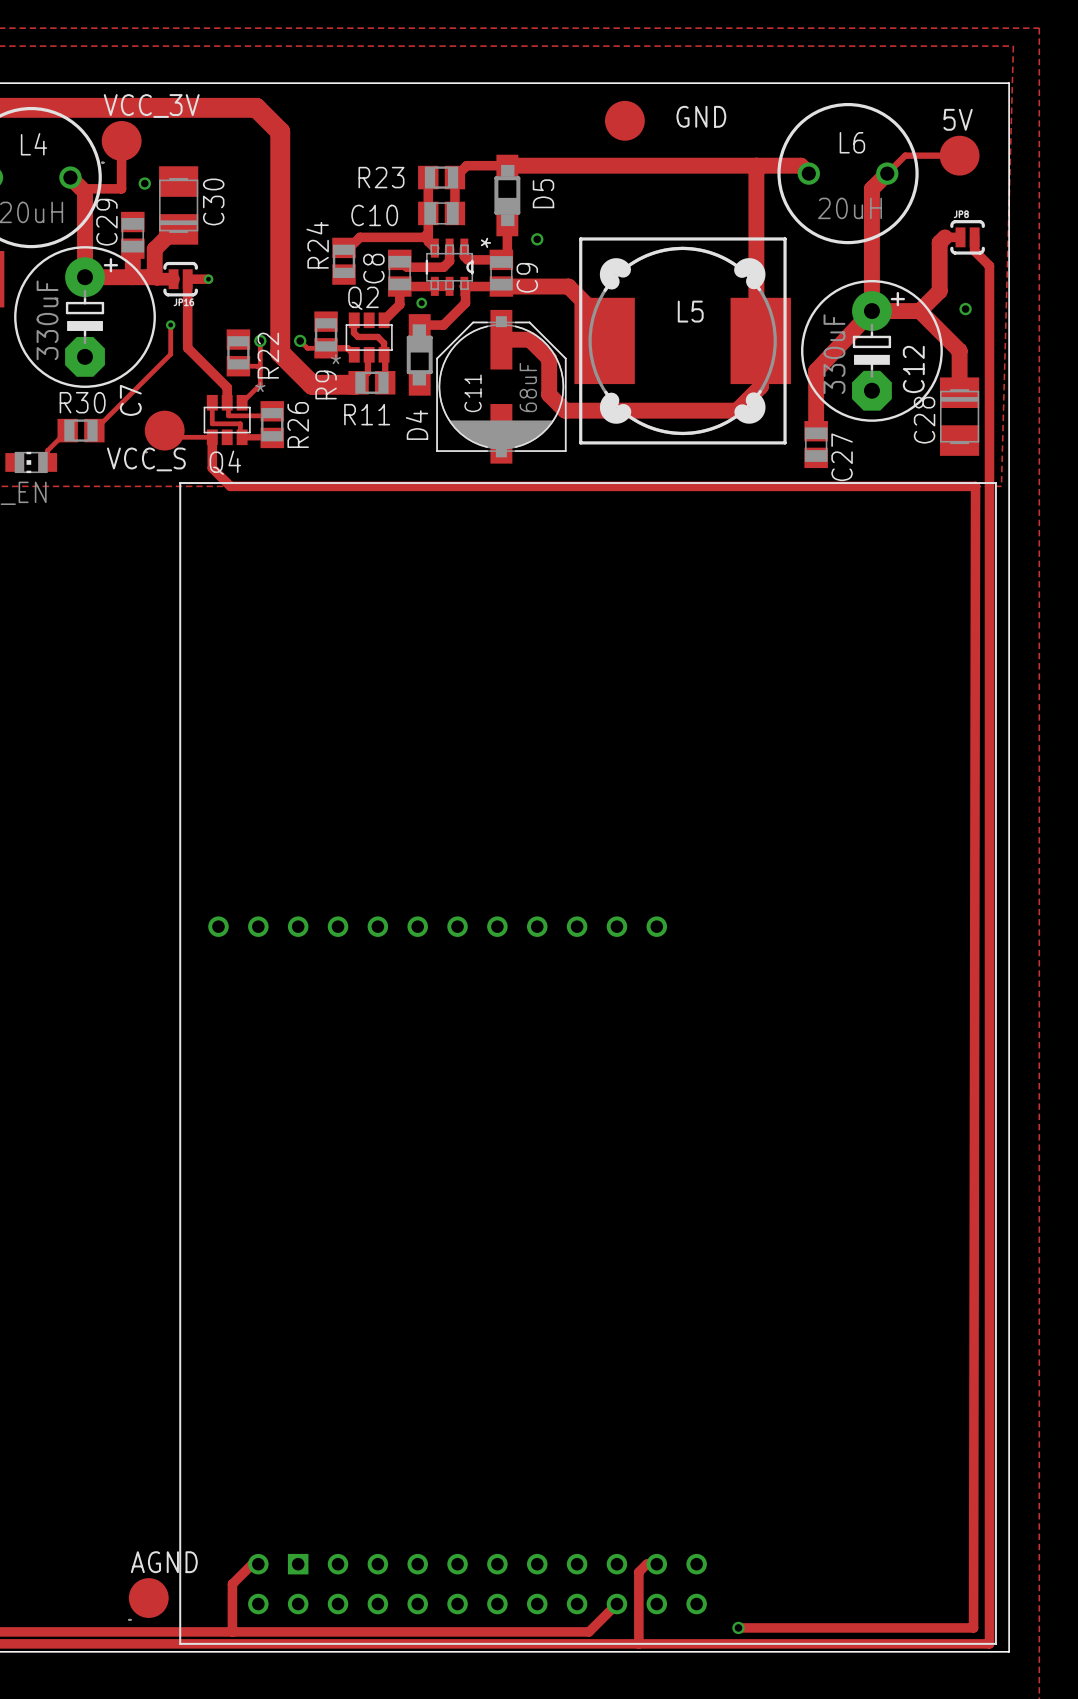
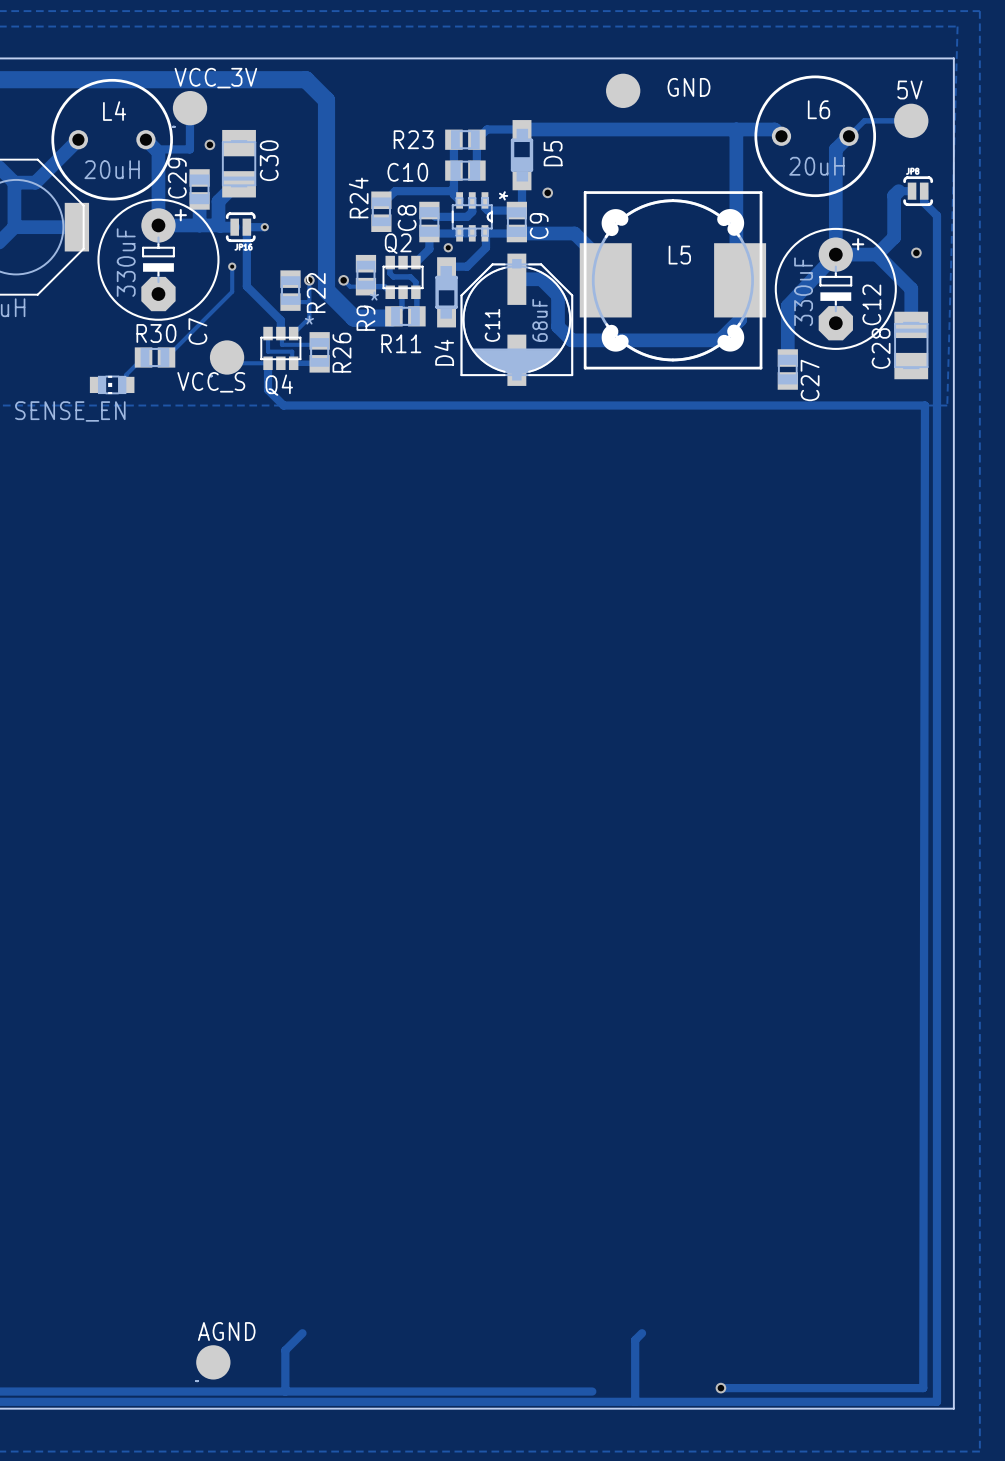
part: (588, 1063) -> none
track: (616, 1604) (589, 1631) -> none

